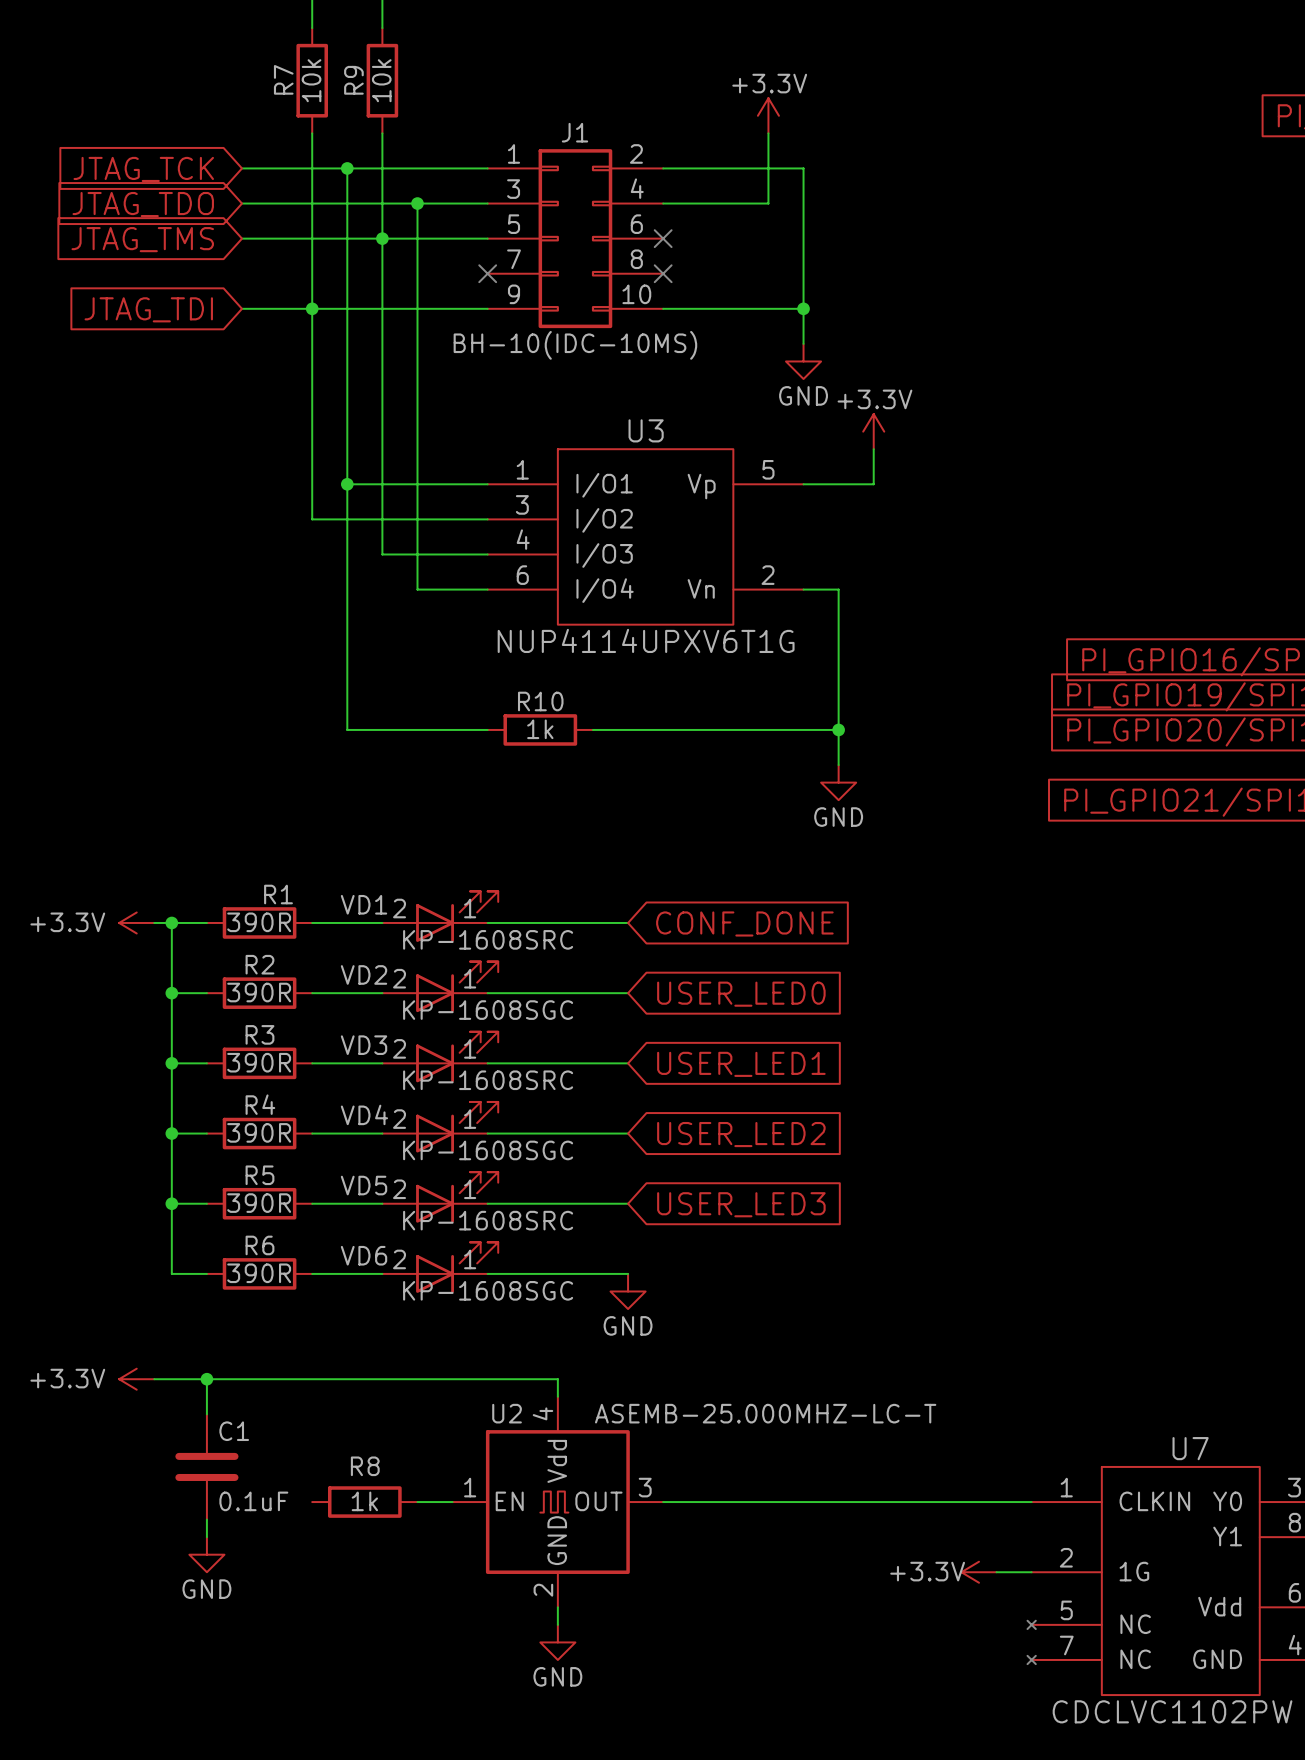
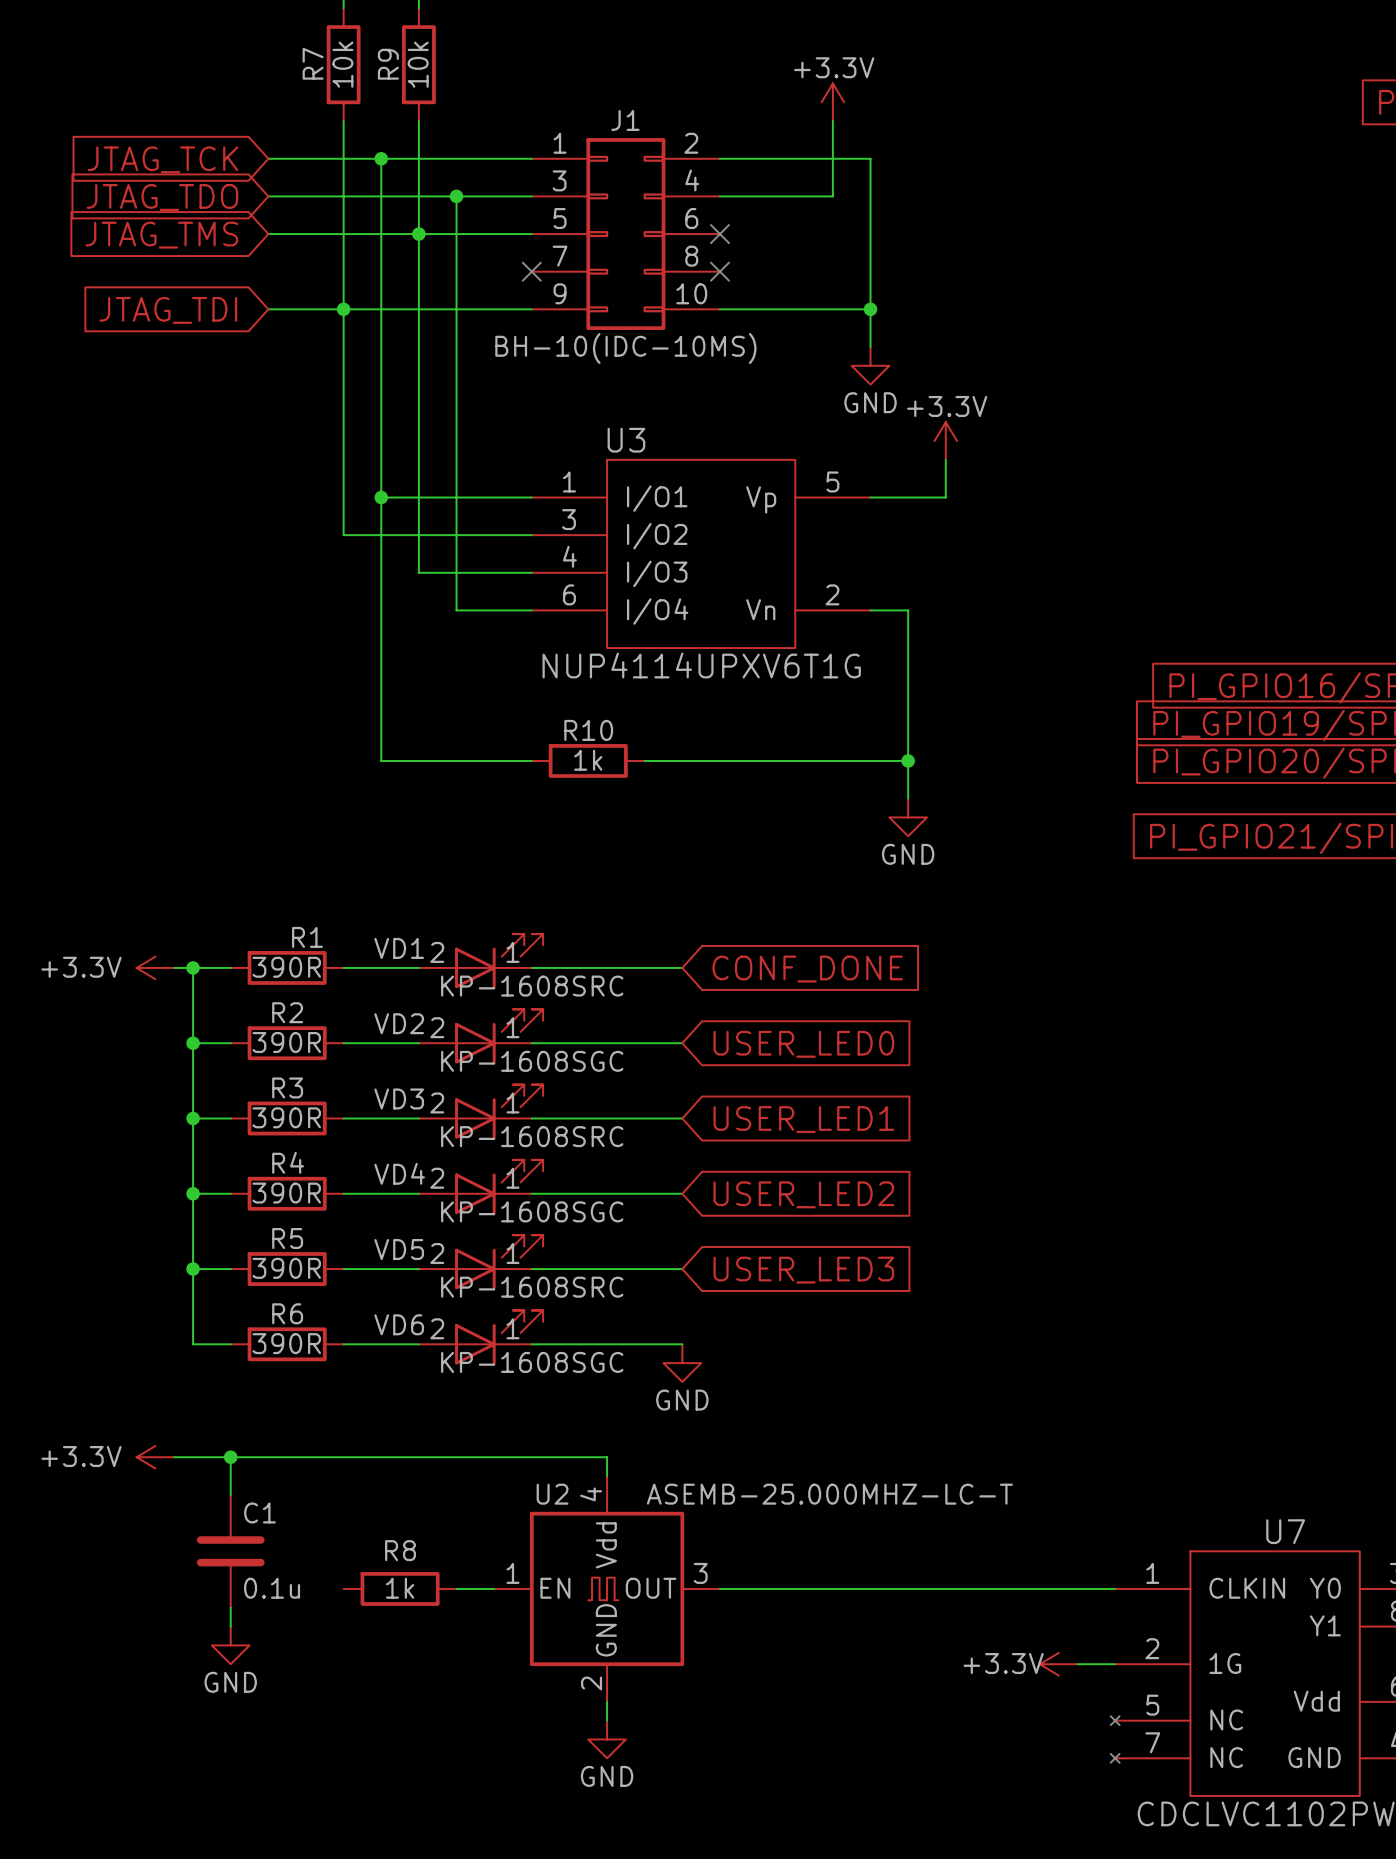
U3 name position: U3 (646, 430) -> U3 (626, 440)
C1 value: 0.1uF (253, 1501) -> 0.1u (272, 1588)

